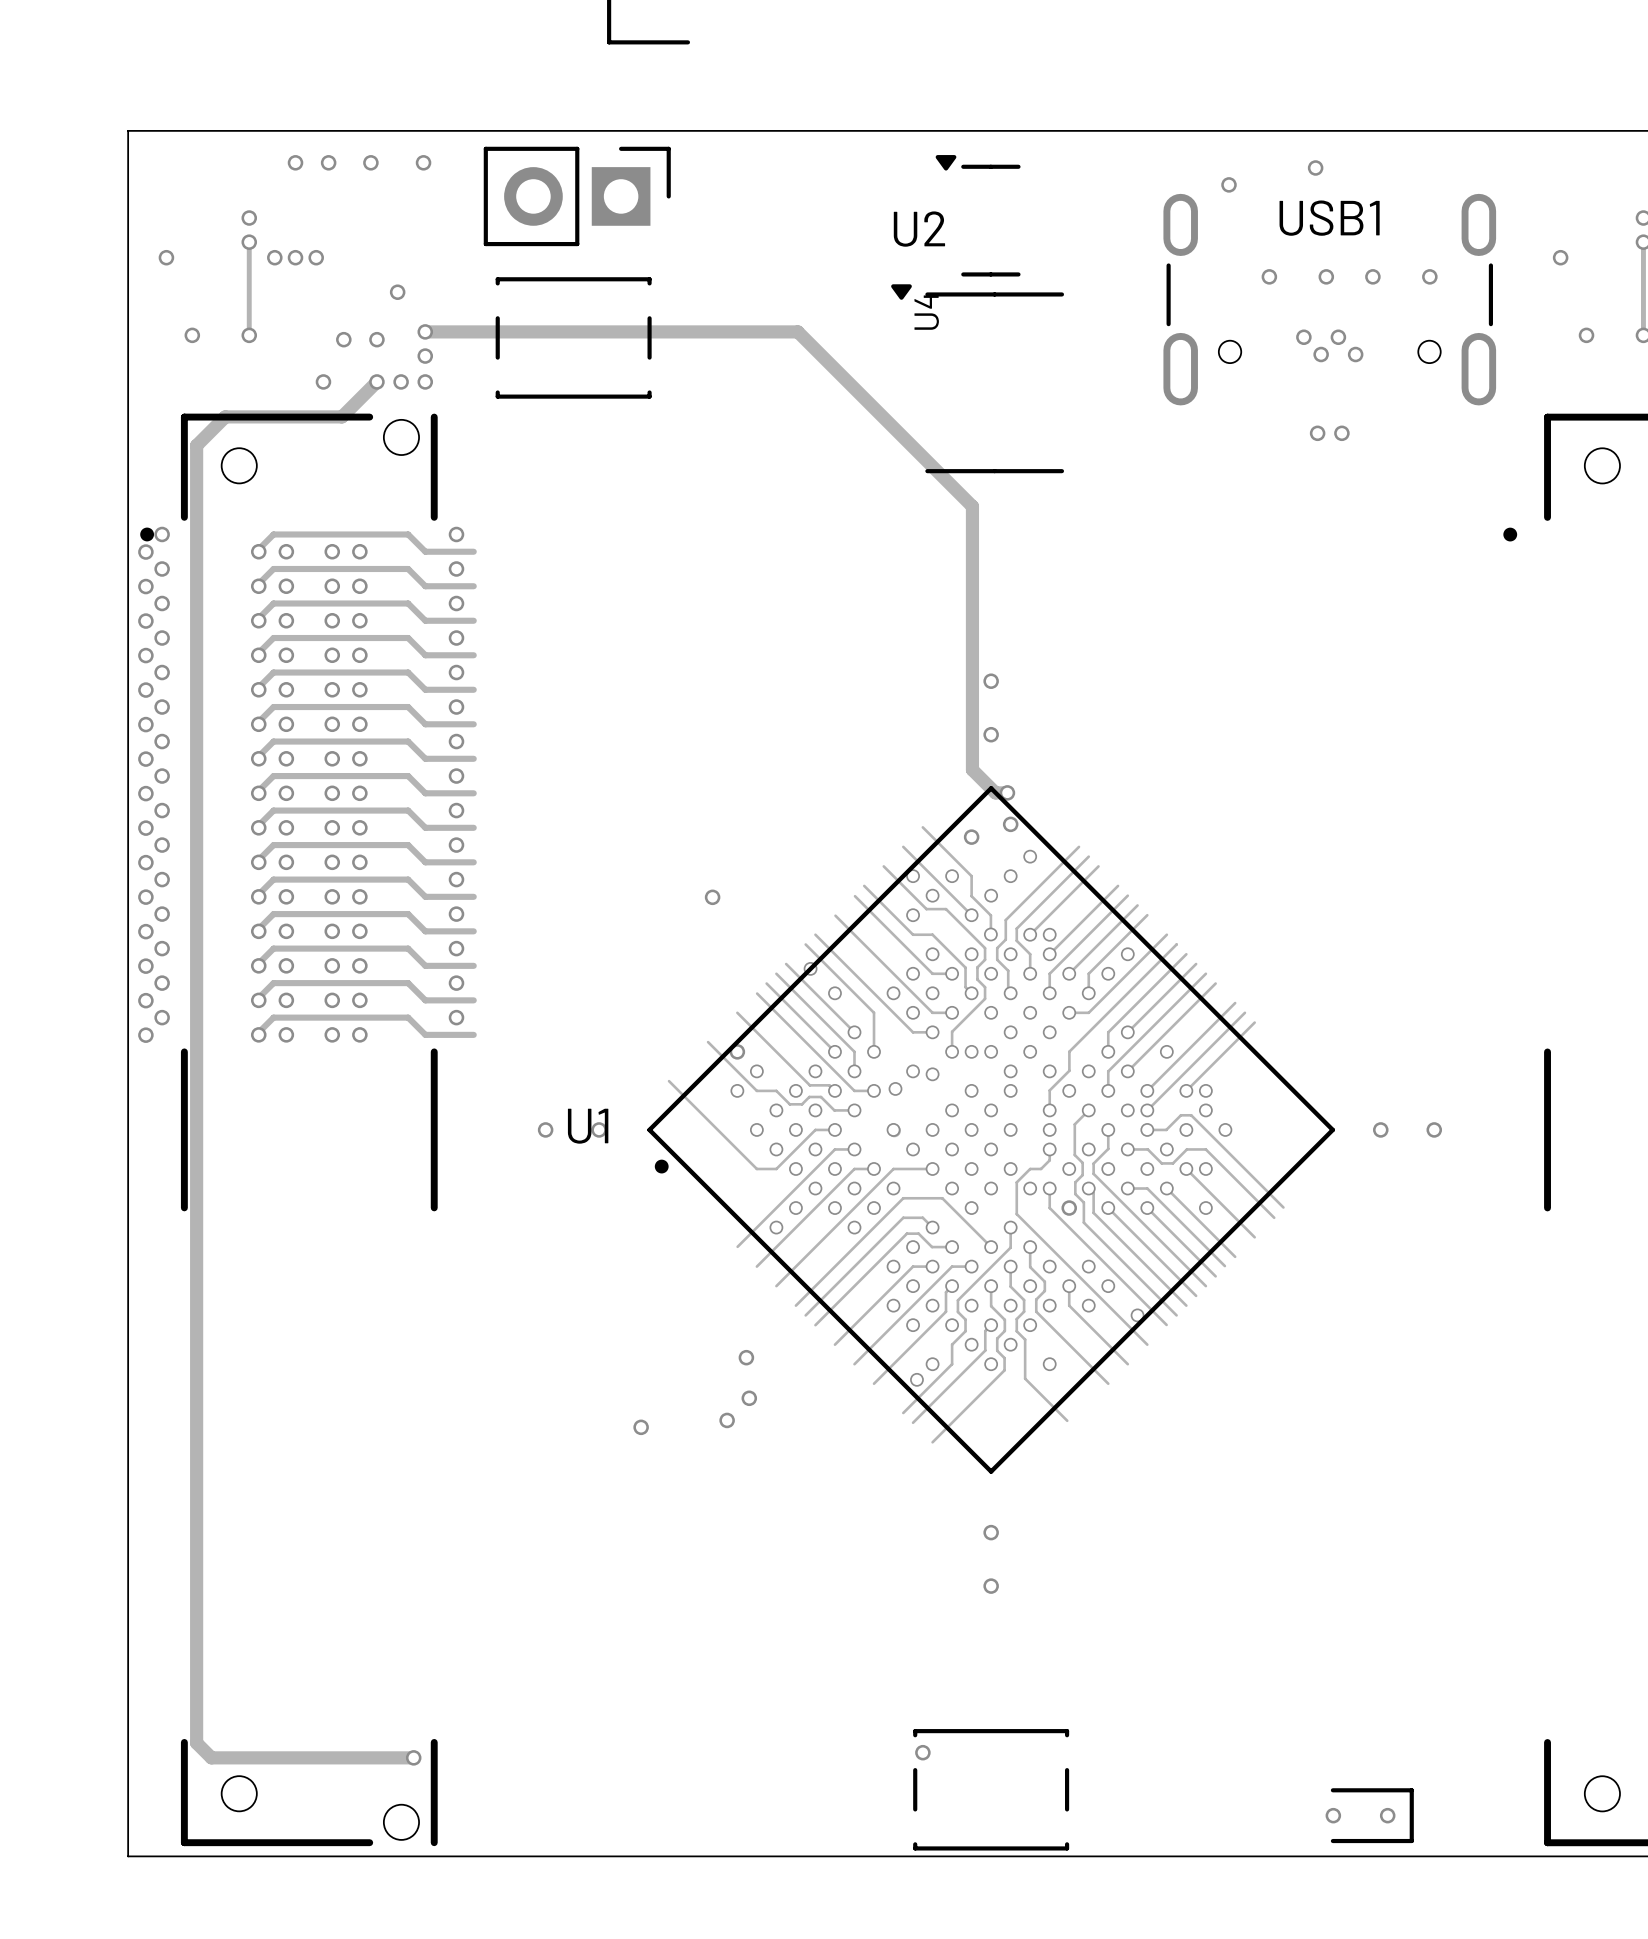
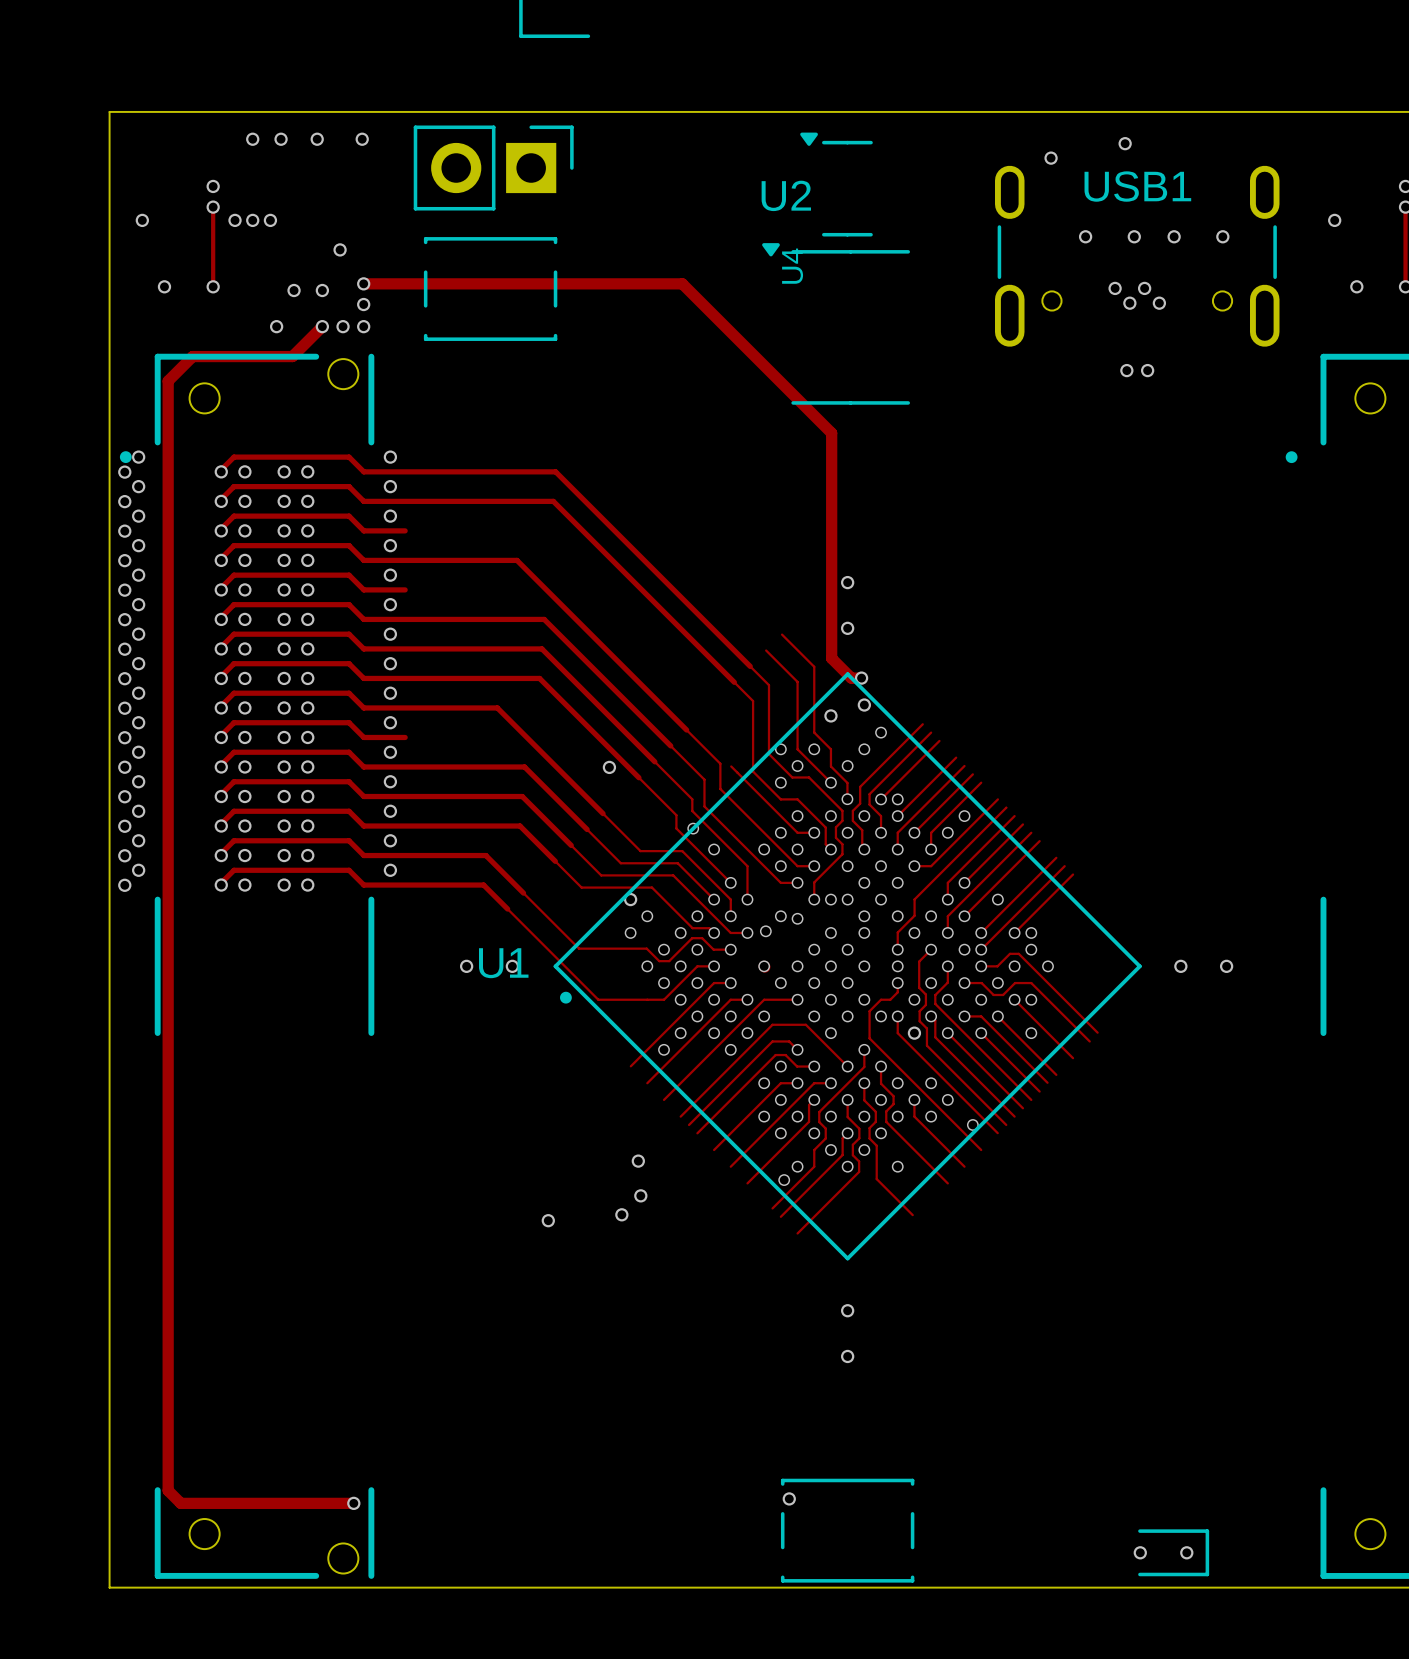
track: (922, 827) (952, 856) -> (782, 634) (814, 666) (814, 732)
track: (903, 846) (932, 876) -> (766, 650) (797, 681) (797, 749)
track: (883, 866) (899, 881) -> (405, 471) (555, 471) (769, 685) (769, 754)
track: (864, 885) (880, 902) -> (405, 501) (553, 501) (753, 701) (753, 771)
track: (835, 915) (842, 922) -> (405, 560) (517, 560) (720, 763) (720, 789)
track: (815, 934) (823, 943) -> (405, 619) (544, 619) (704, 779) (704, 806)
track: (805, 944) (809, 948) -> (405, 648) (541, 648) (692, 799) (692, 811)
track: (786, 964) (790, 968) -> (405, 678) (539, 678) (676, 815) (676, 828)
track: (776, 973) (797, 995) -> (405, 707) (497, 707) (640, 851) (682, 851)
track: (766, 983) (792, 1009) -> (405, 766) (524, 766) (620, 863) (677, 863)
track: (757, 993) (787, 1023) -> (405, 796) (522, 796) (601, 875) (673, 875)
track: (737, 1012) (762, 1037) -> (405, 826) (520, 826) (581, 887) (652, 887)
track: (708, 1042) (756, 1090) (776, 1090) (789, 1104) (802, 1104) -> (405, 855) (485, 855) (579, 948) (646, 948) (659, 961) (669, 961) (685, 944)
track: (669, 1081) (756, 1168) -> (405, 885) (483, 885) (598, 999) (647, 999)

